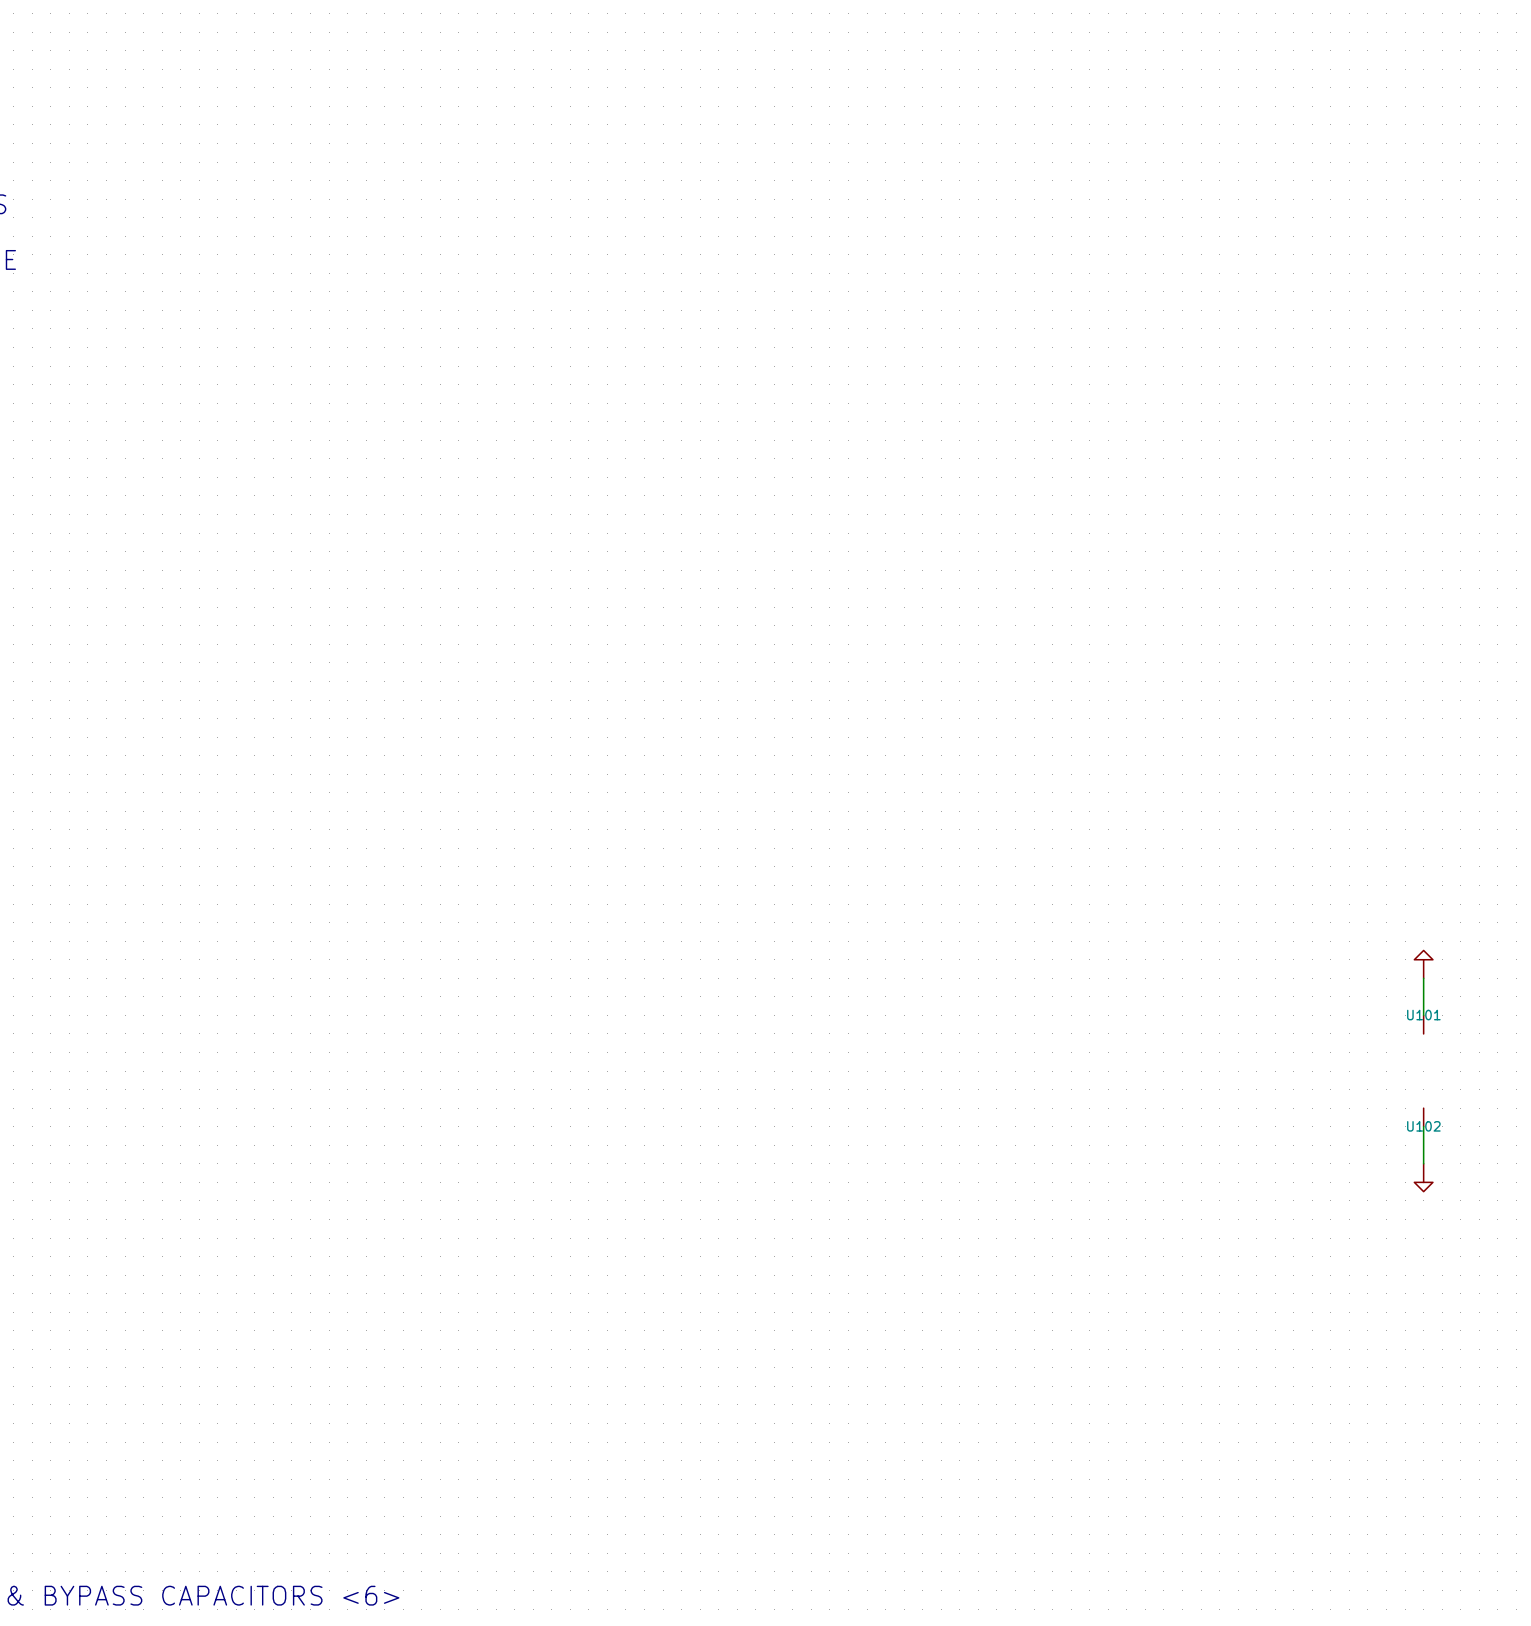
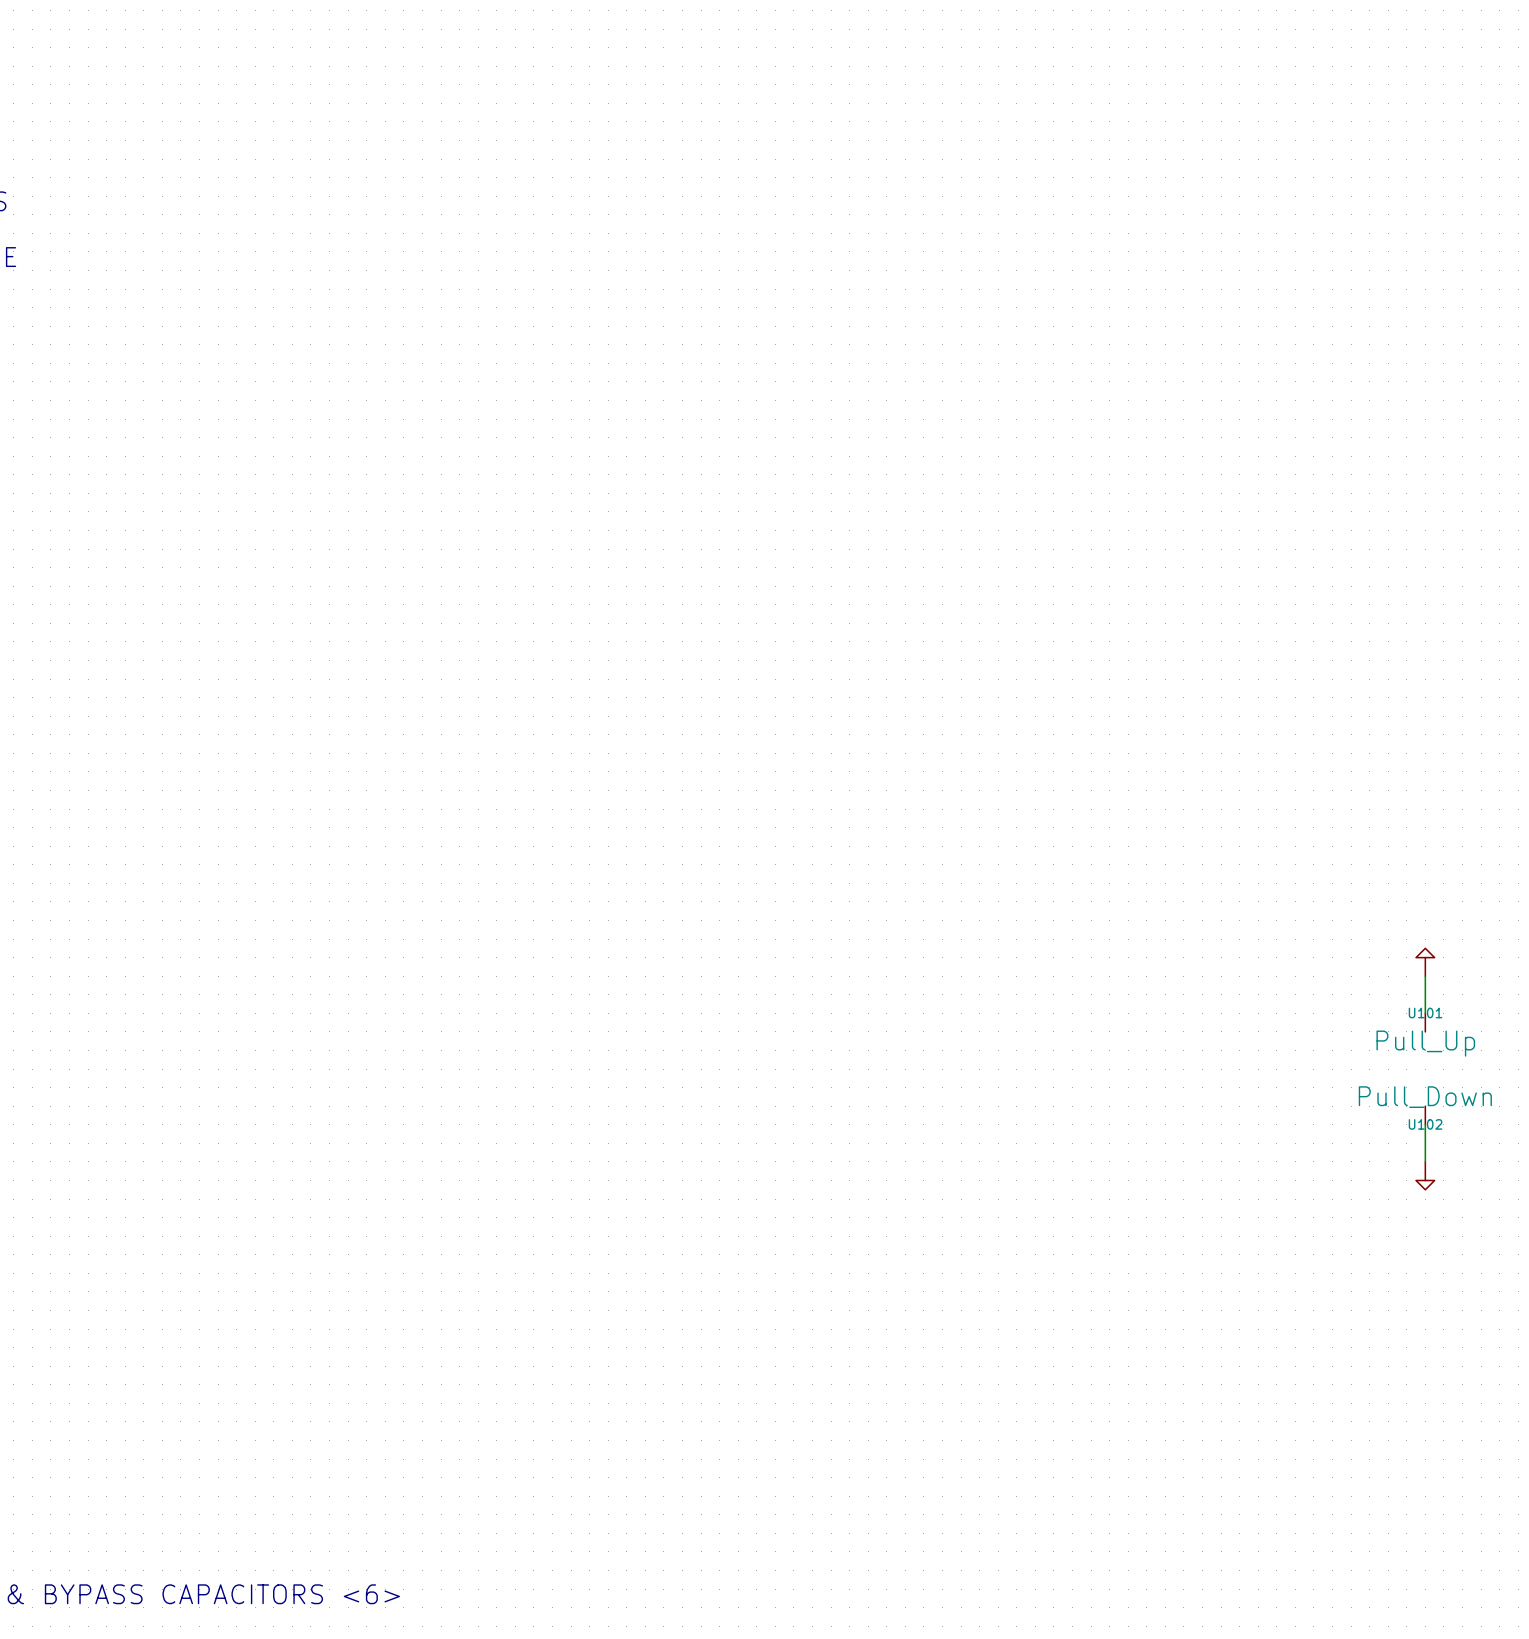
U101 value: none -> Pull_Up (1425, 1043)
U102 value: none -> Pull_Down (1425, 1097)

